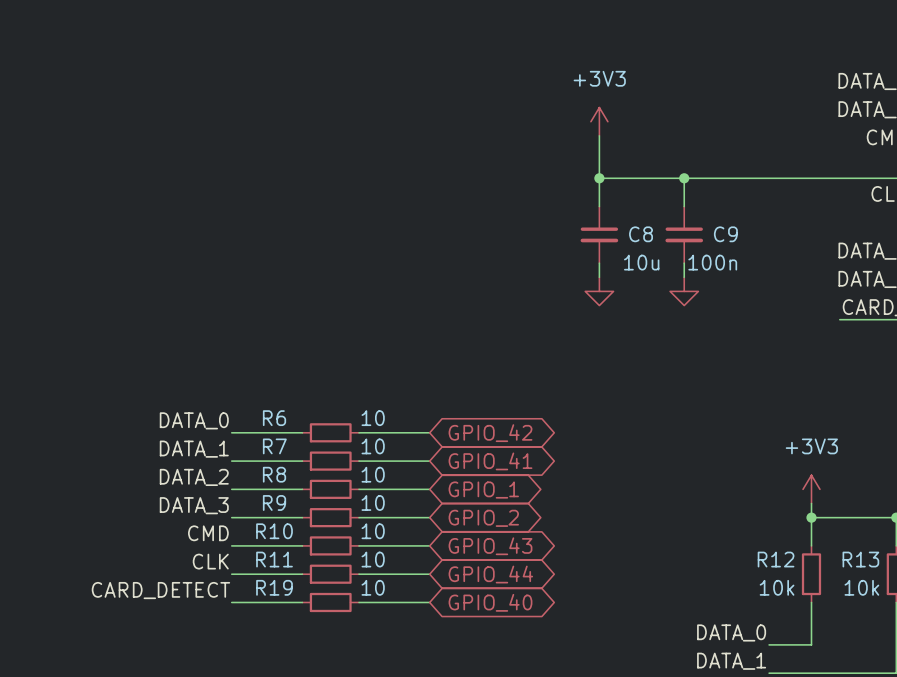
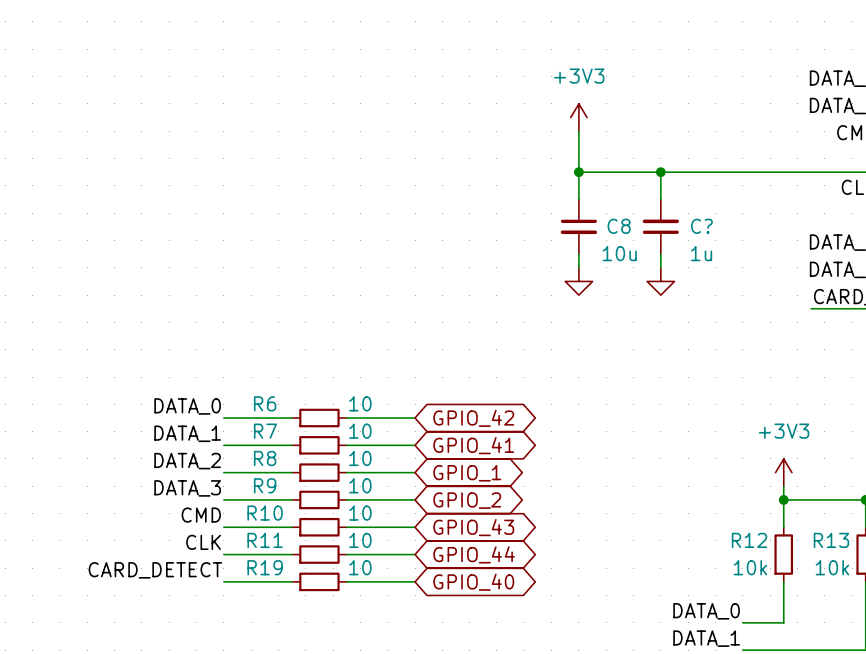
C9: 100n (684, 234) -> none
C?: none -> 1u (660, 226)

